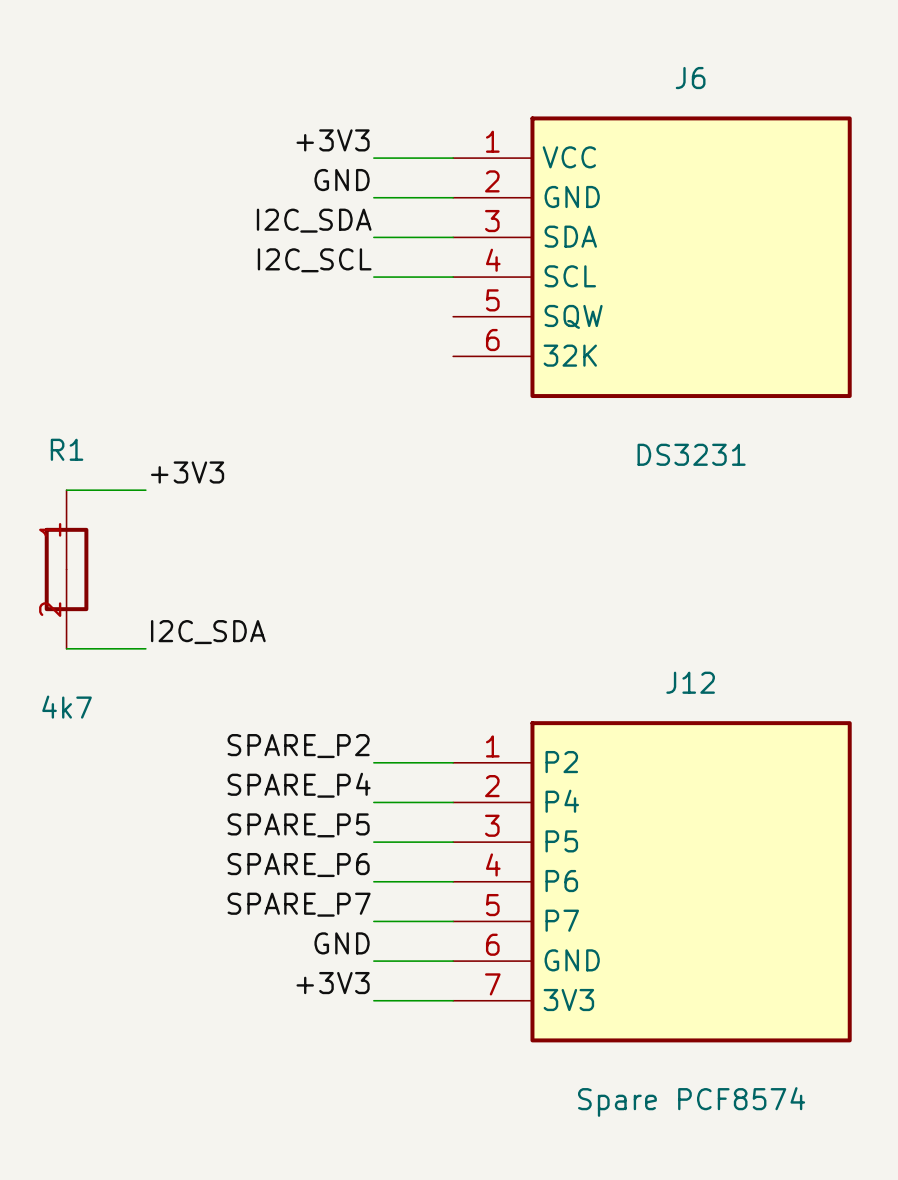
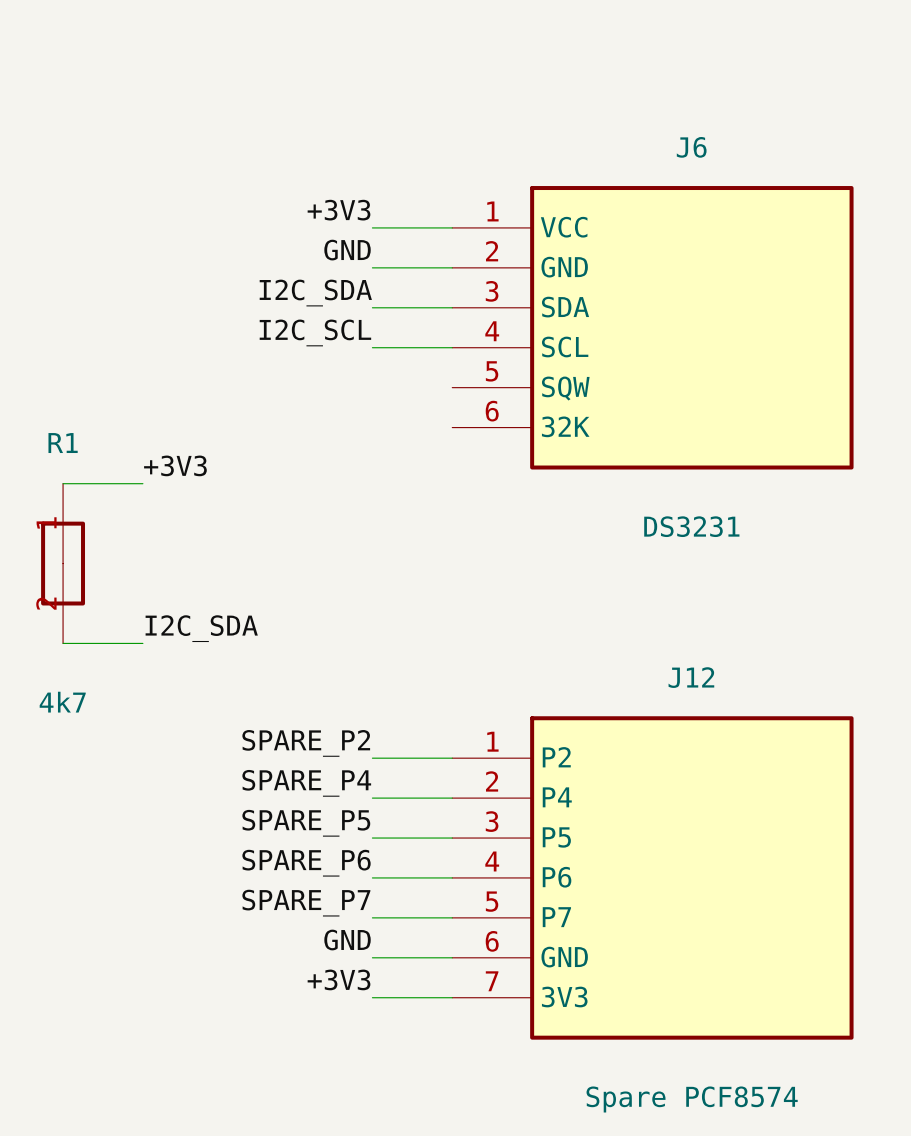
label: +3V3 (333, 140) -> none
wire: (373, 158) (453, 158) -> (372, 227) (452, 227)
label: GND (342, 180) -> none
wire: (373, 197) (453, 197) -> (372, 267) (452, 267)
label: I2C_SDA (314, 220) -> +3V3 (339, 210)
wire: (373, 237) (453, 237) -> (372, 307) (452, 307)
J6 position: (652, 257) -> (652, 327)
label: I2C_SCL (314, 260) -> GND (347, 250)
wire: (373, 277) (453, 277) -> (372, 347) (452, 347)
label: none -> I2C_SDA (315, 293)
label: none -> I2C_SCL (315, 332)

